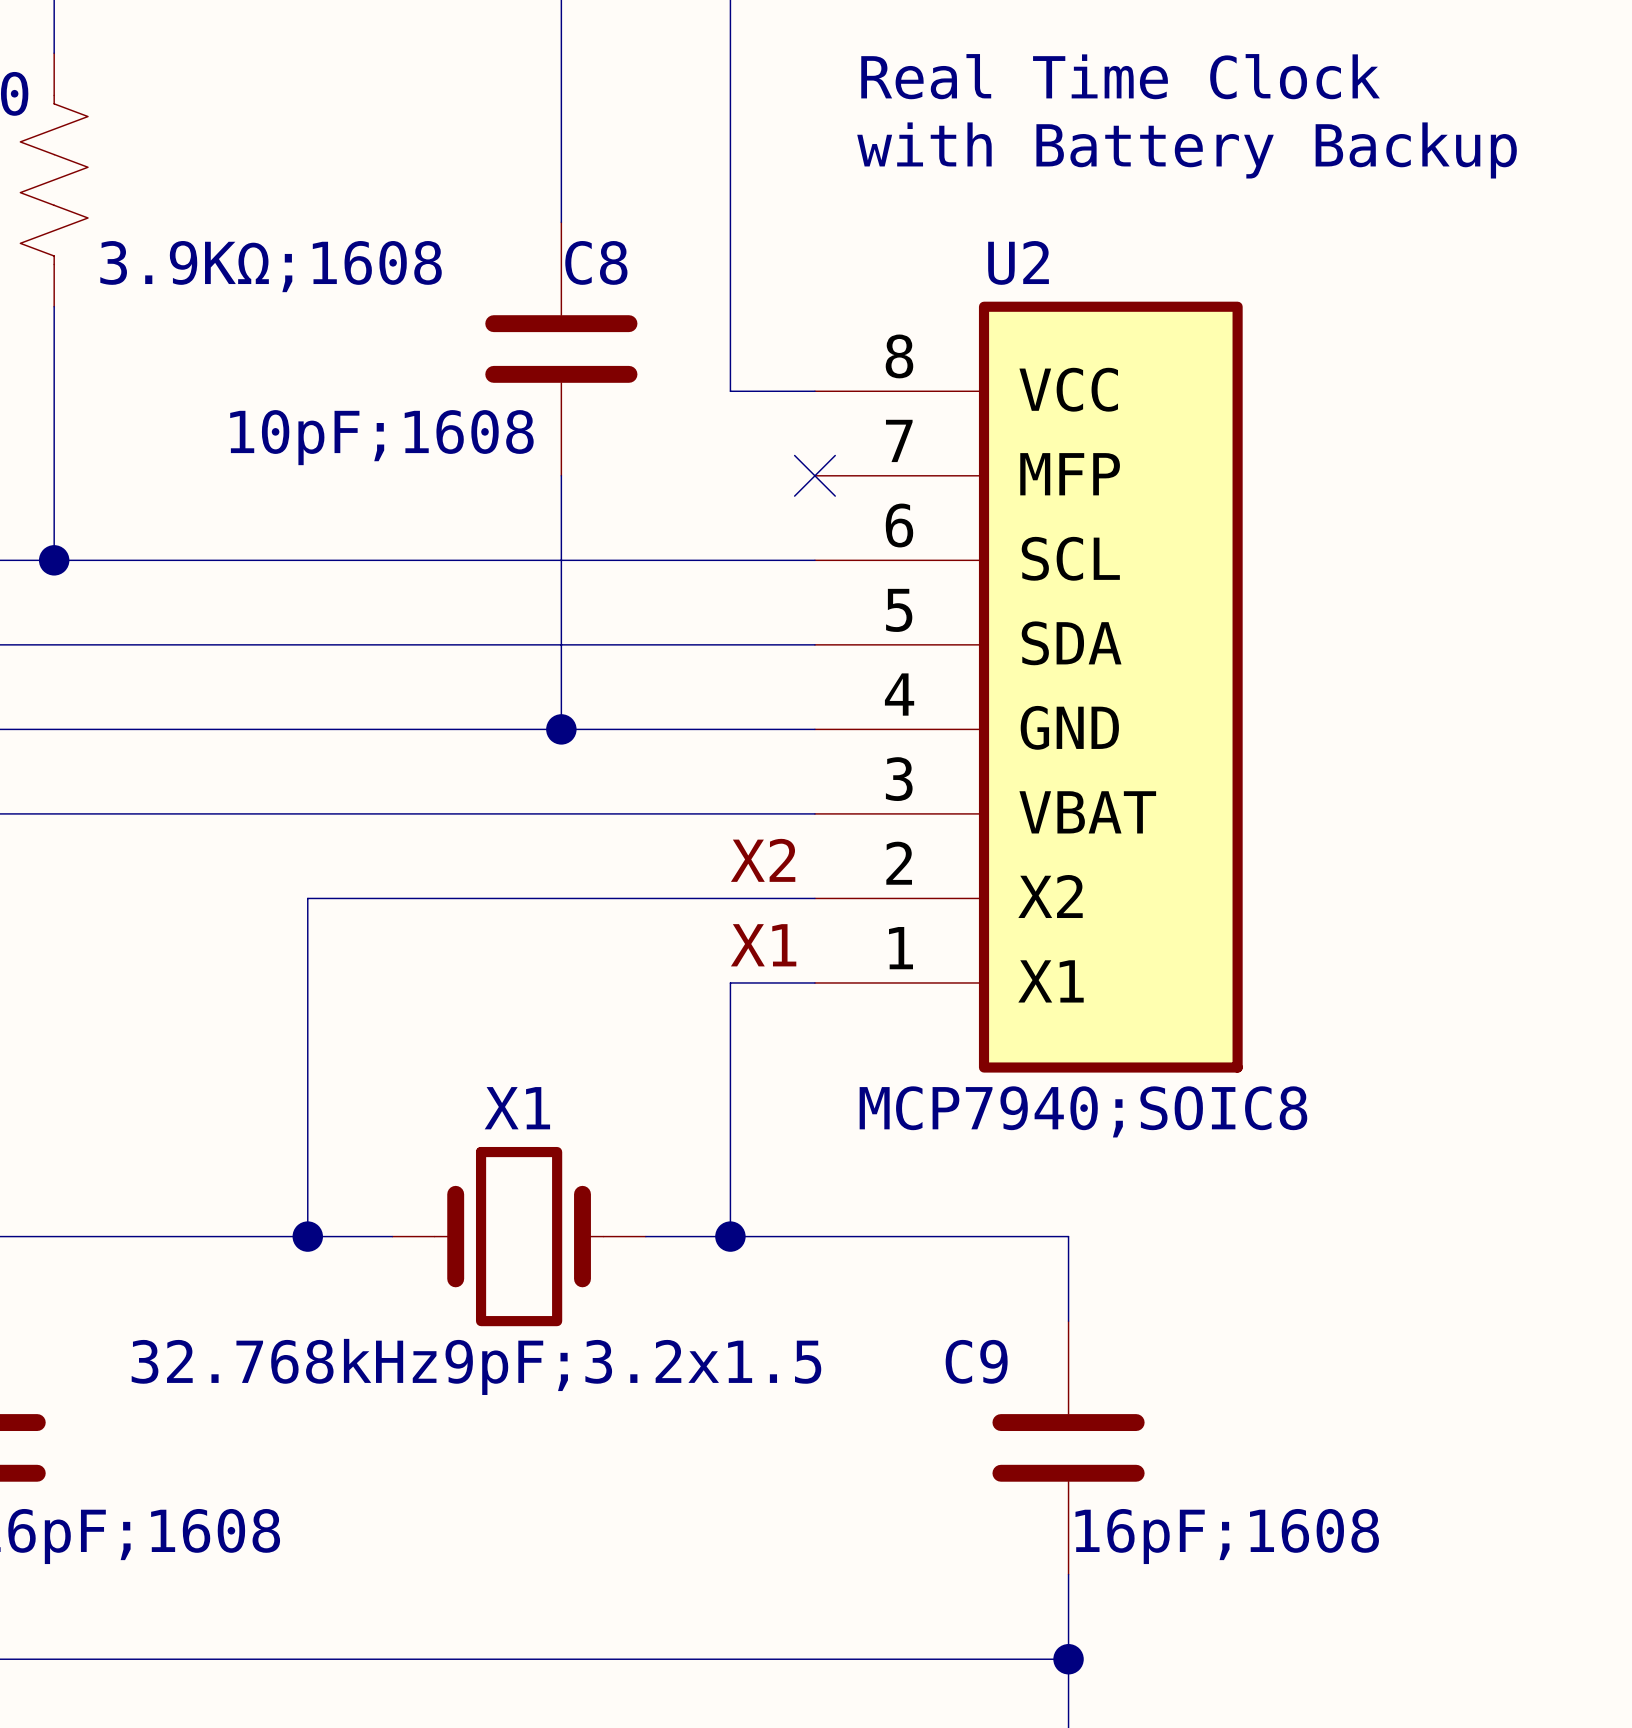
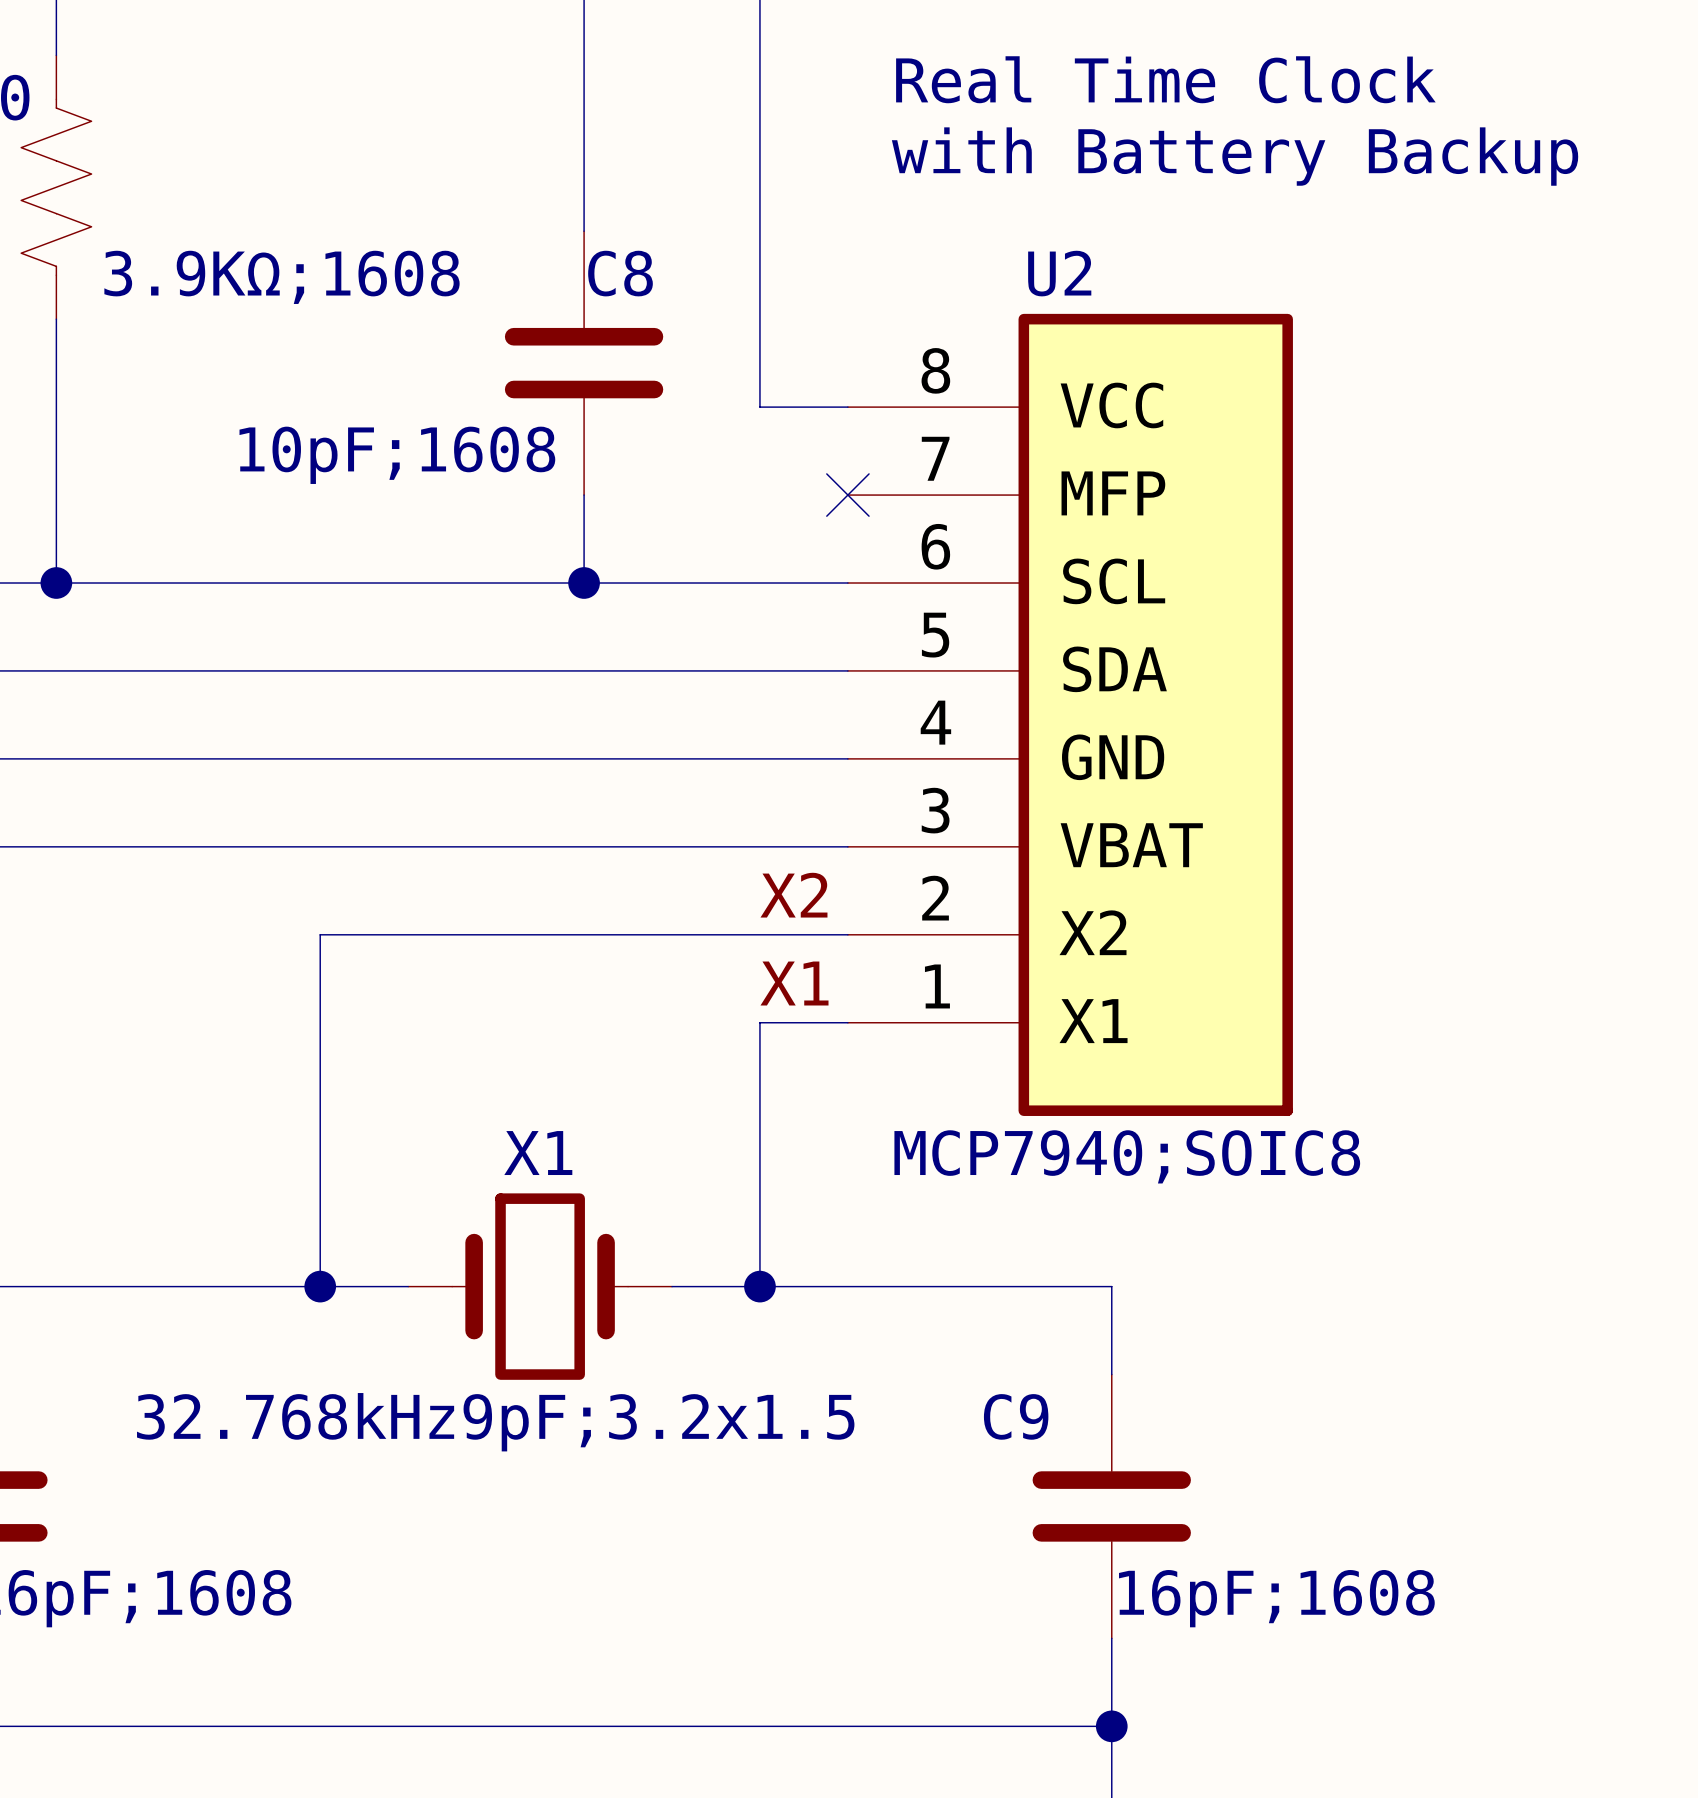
wire: (561, 560) (561, 729) -> none
junction position: (561, 729) -> (584, 583)

